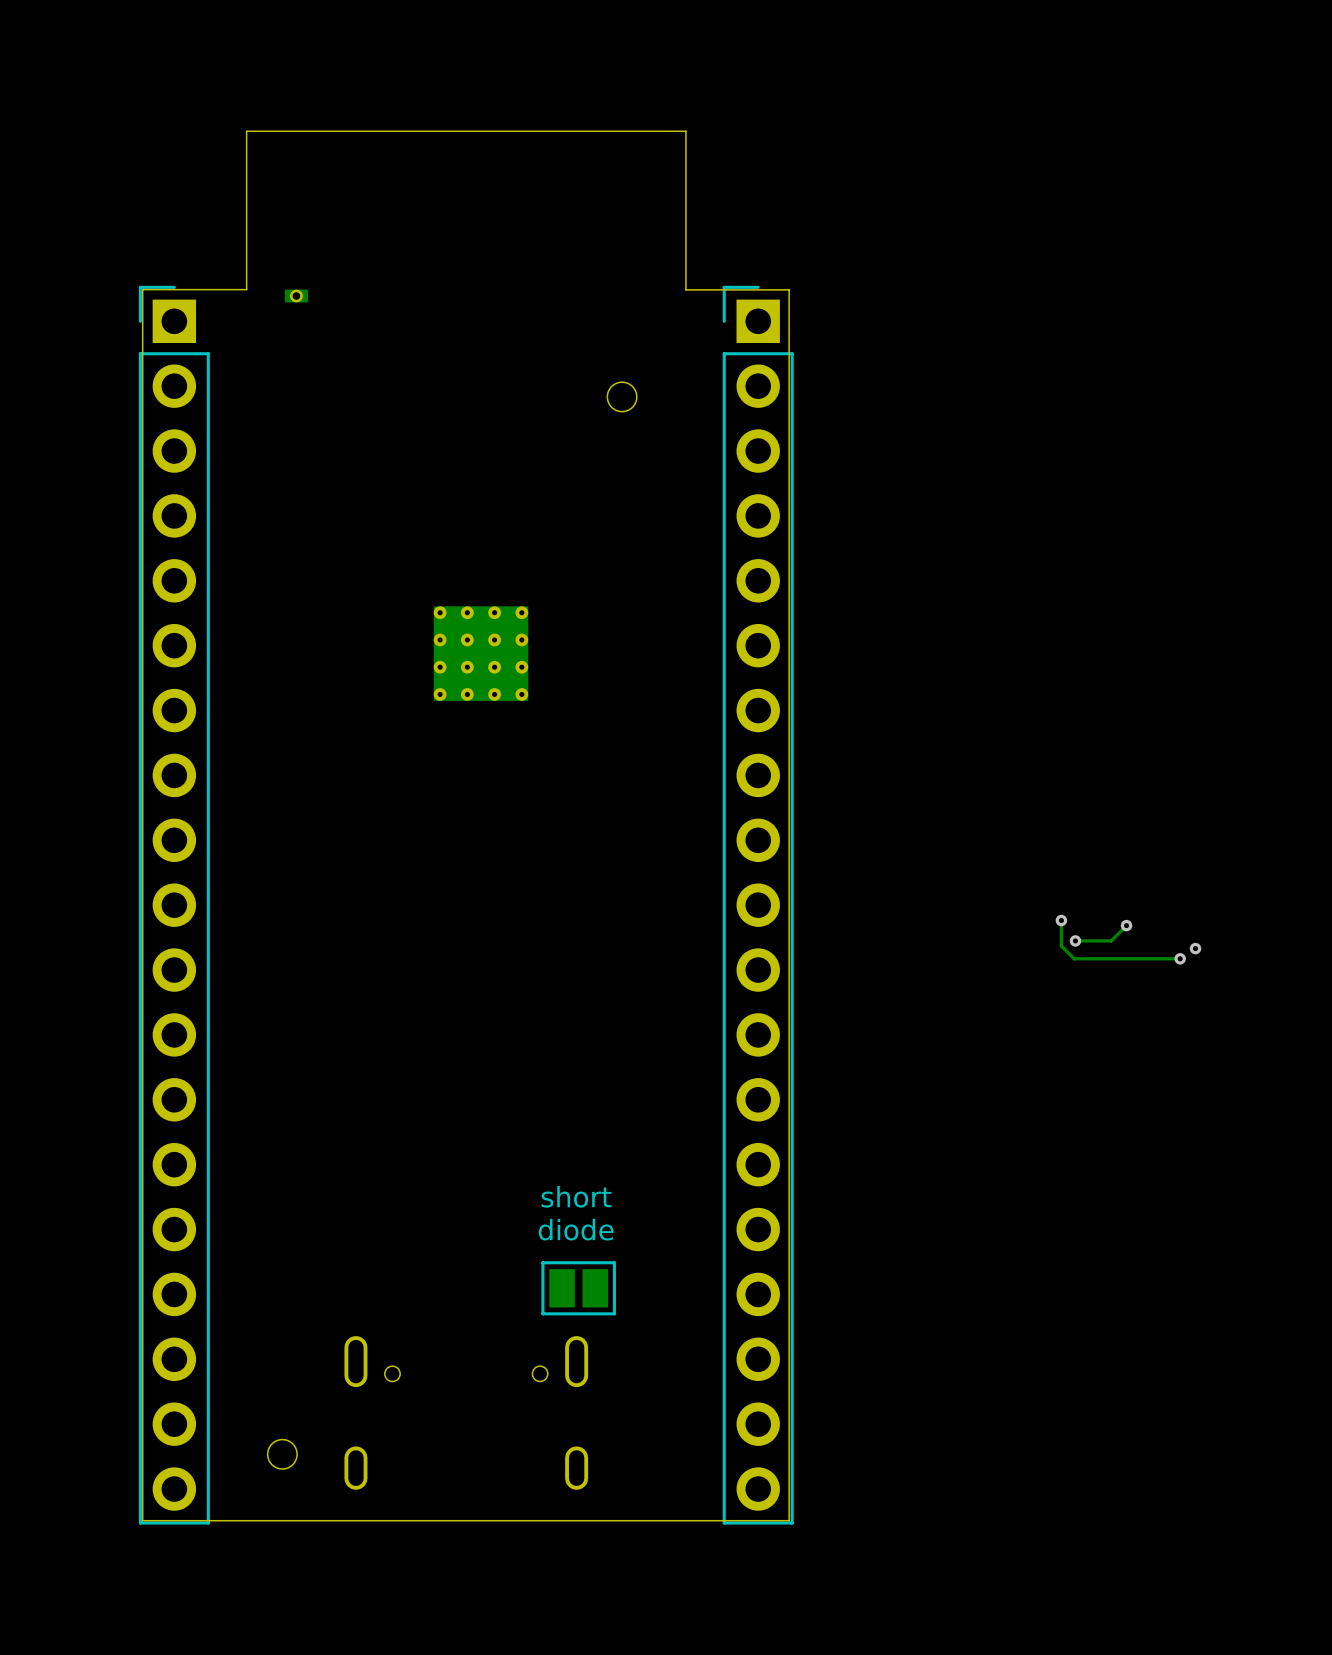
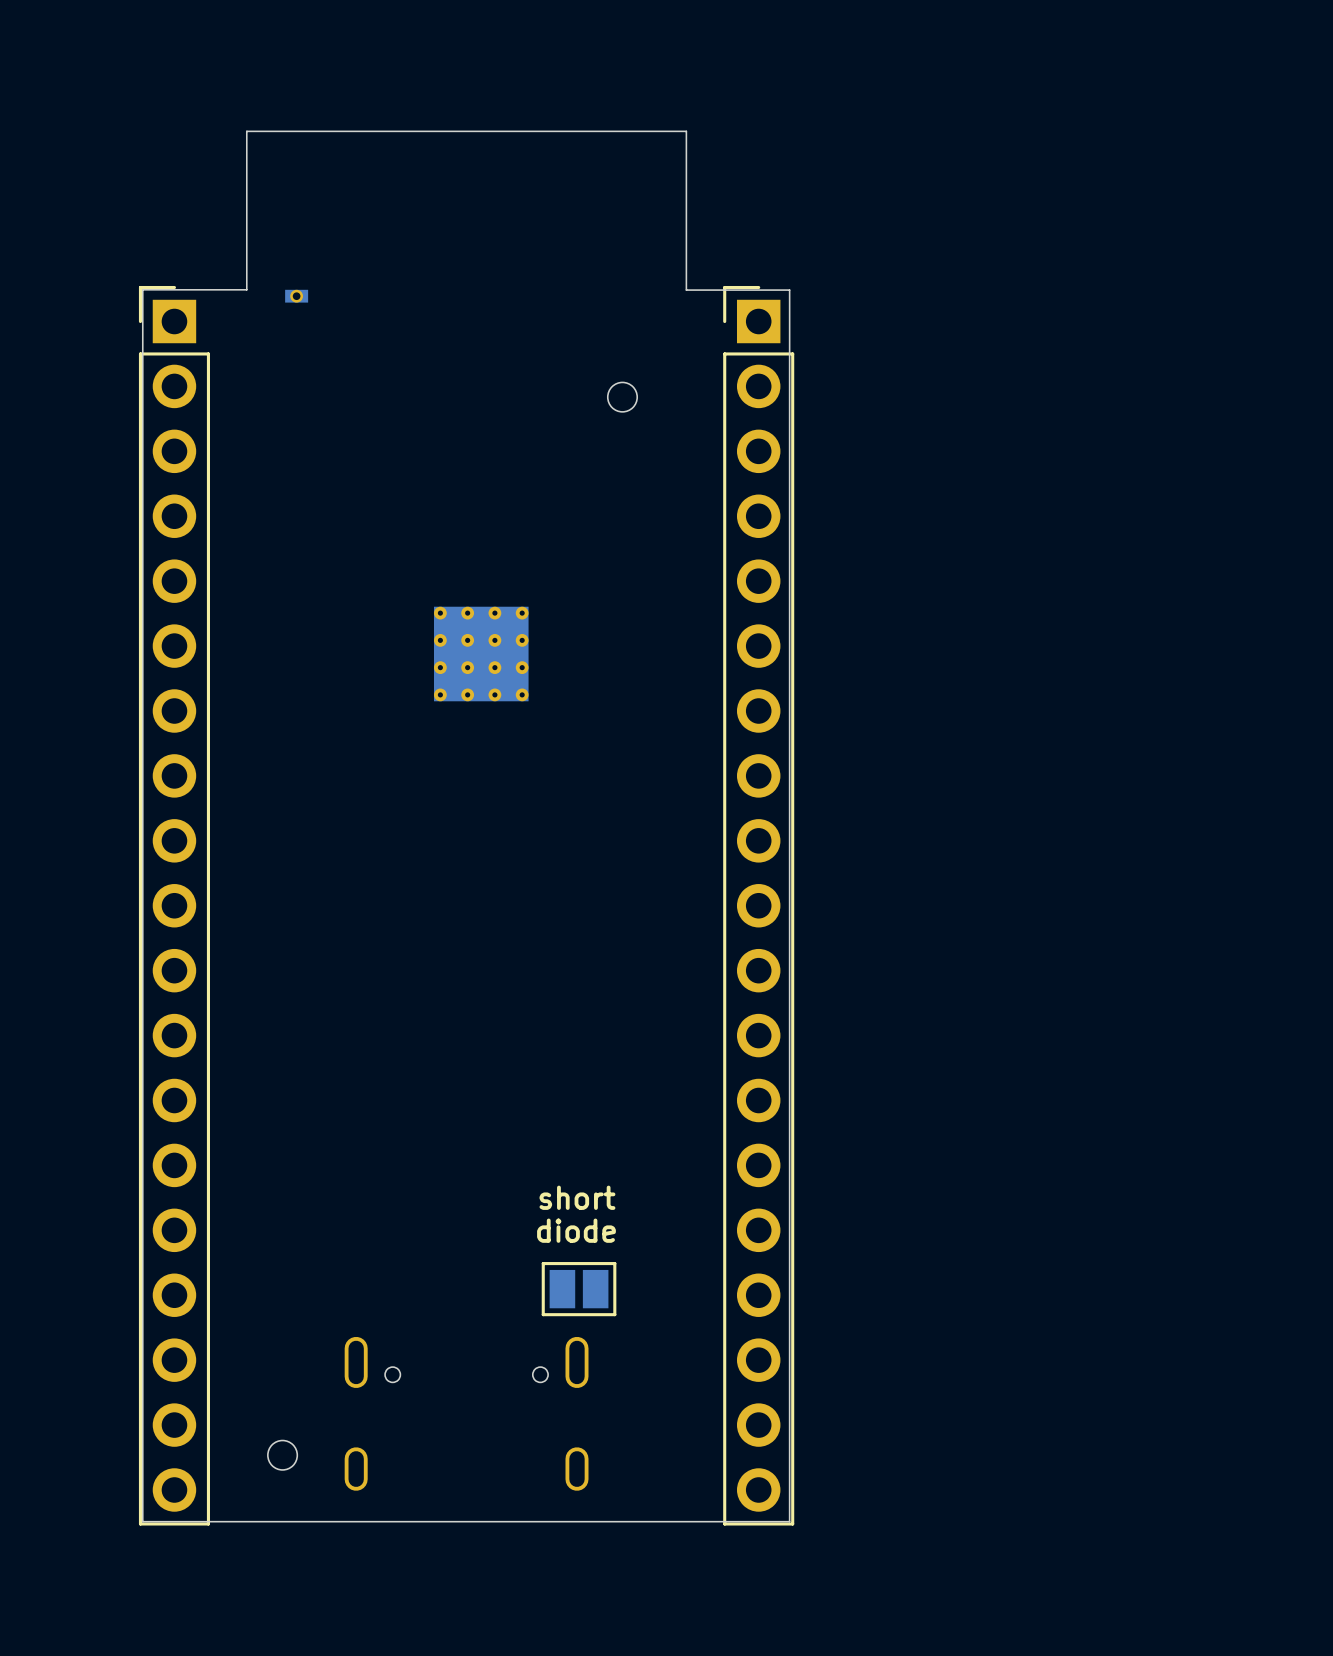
track: (1061, 920) (1061, 946) (1074, 958) (1180, 958) -> none
via: (1061, 920) -> none
track: (1126, 925) (1111, 940) (1075, 940) -> none
via: (1126, 925) -> none
via: (1075, 940) -> none
via: (1195, 948) -> none
via: (1180, 958) -> none

